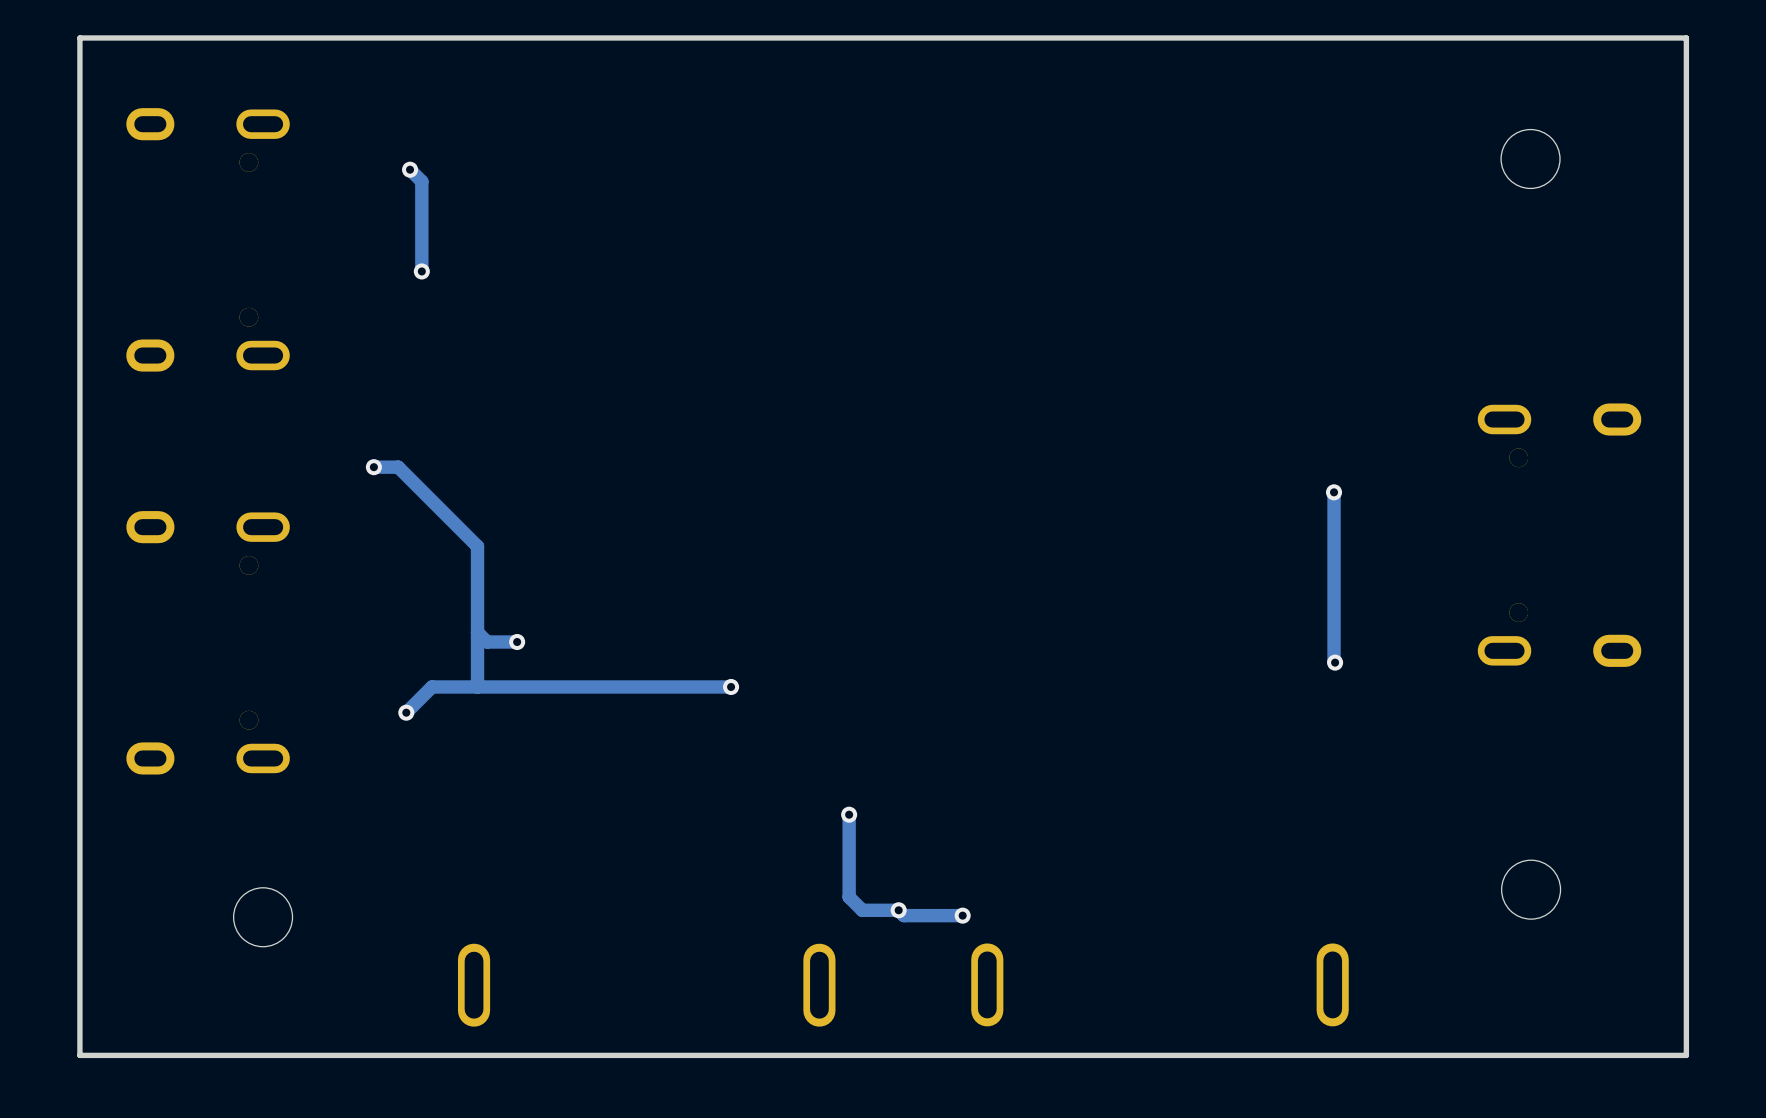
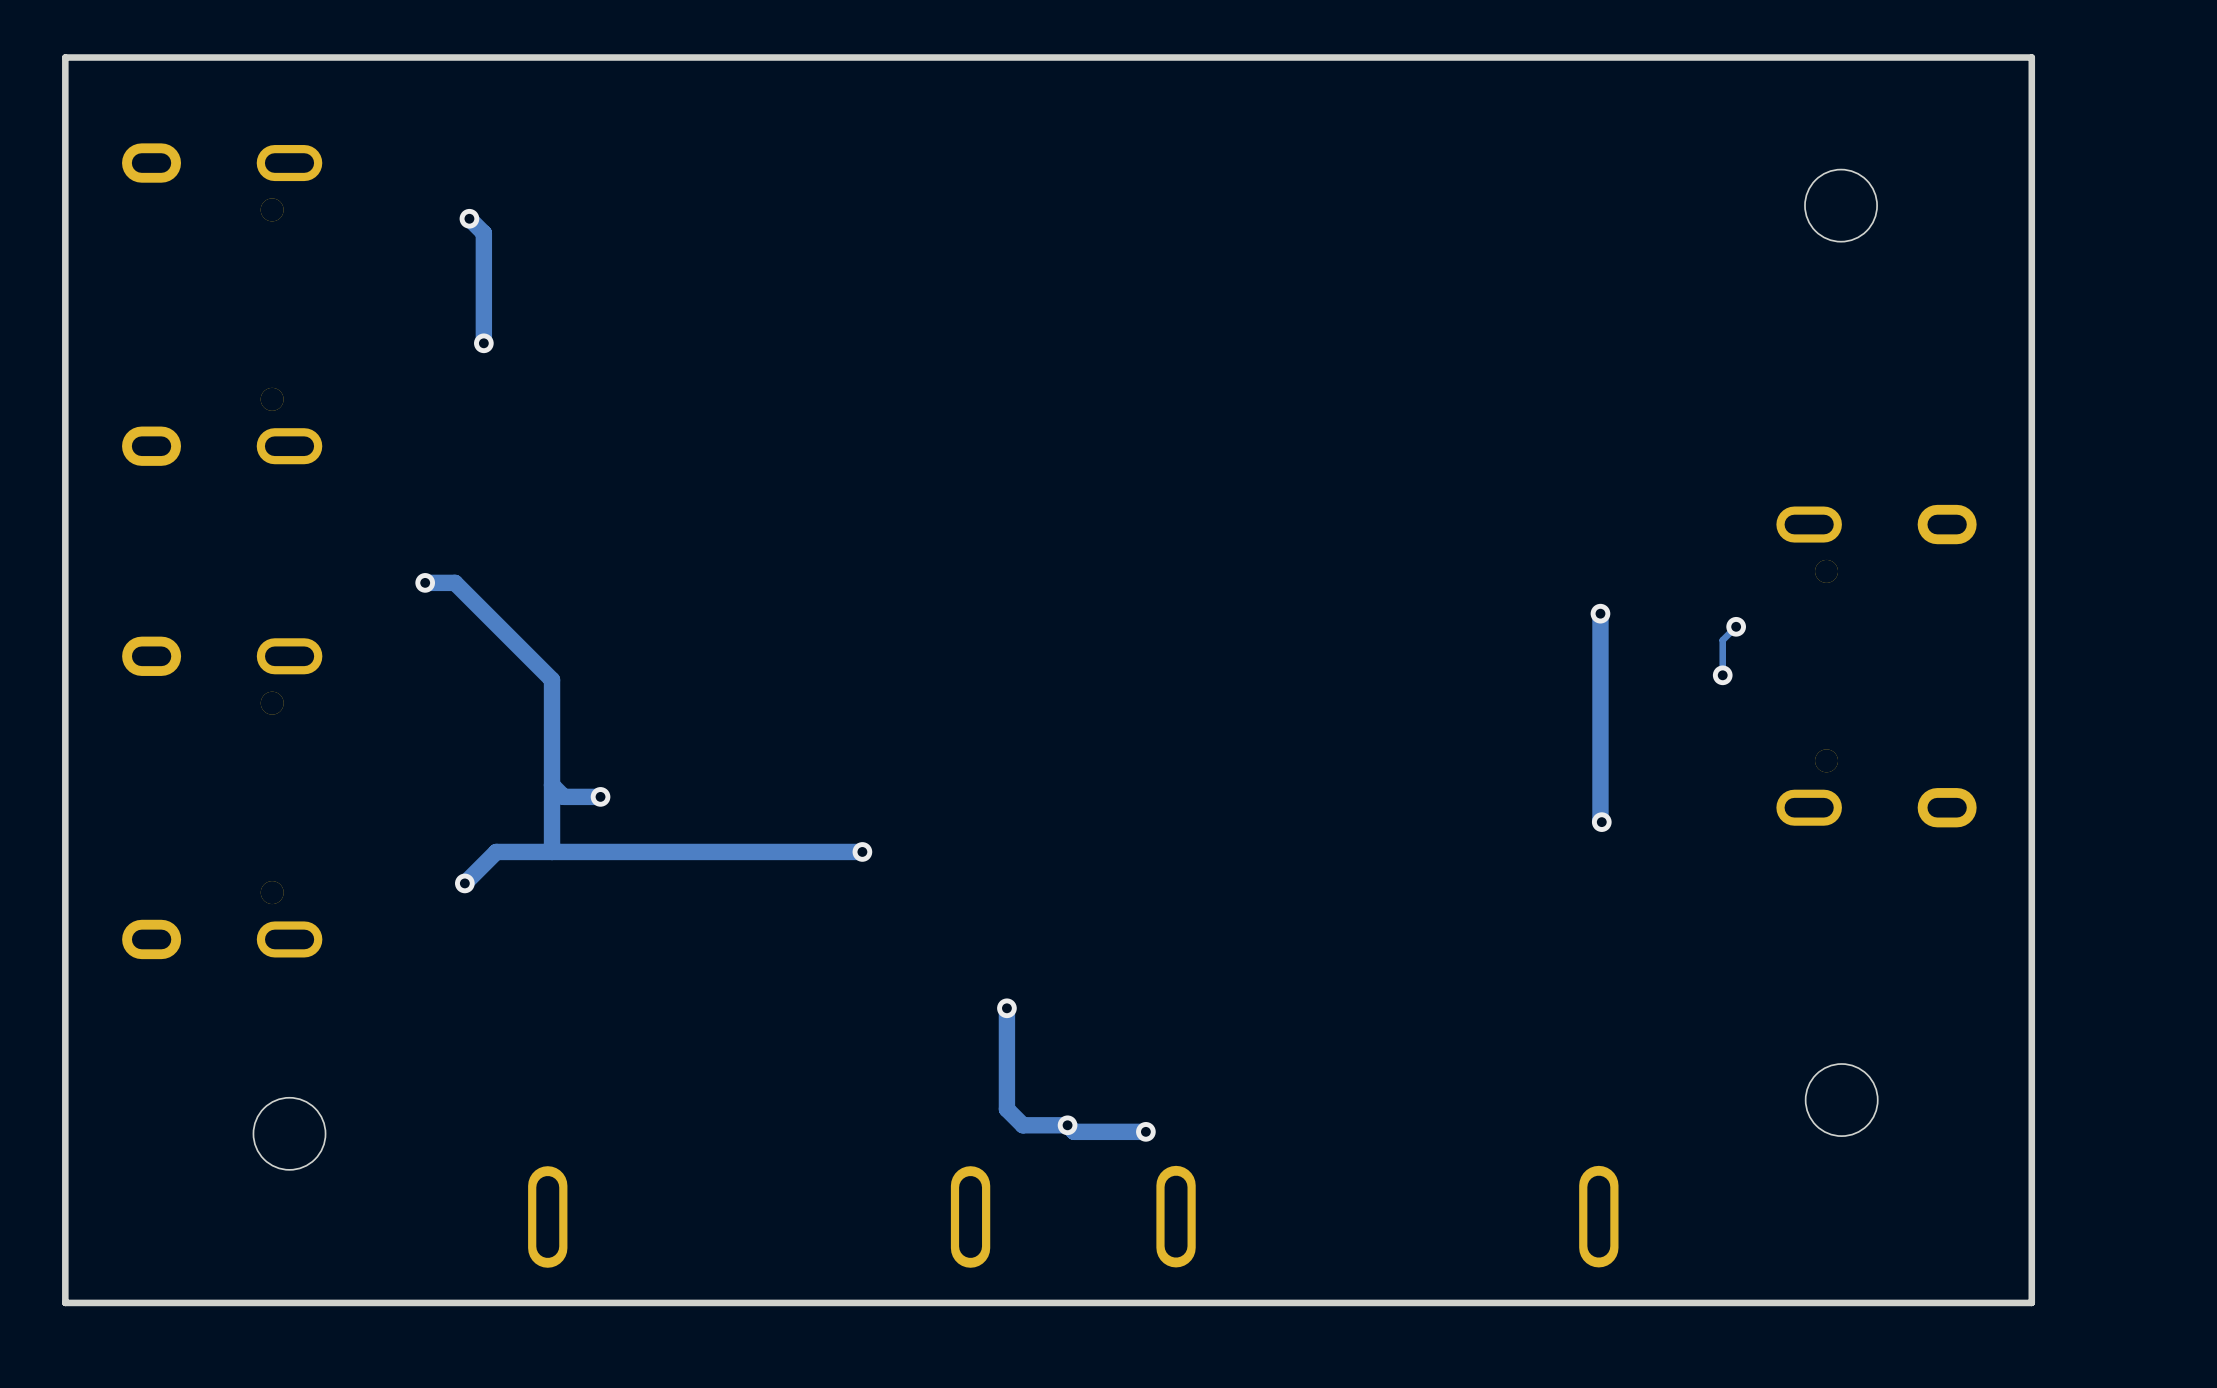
track: none -> (1736, 626) (1722, 640) (1722, 675)
via: none -> (1736, 626)
via: none -> (1722, 675)

